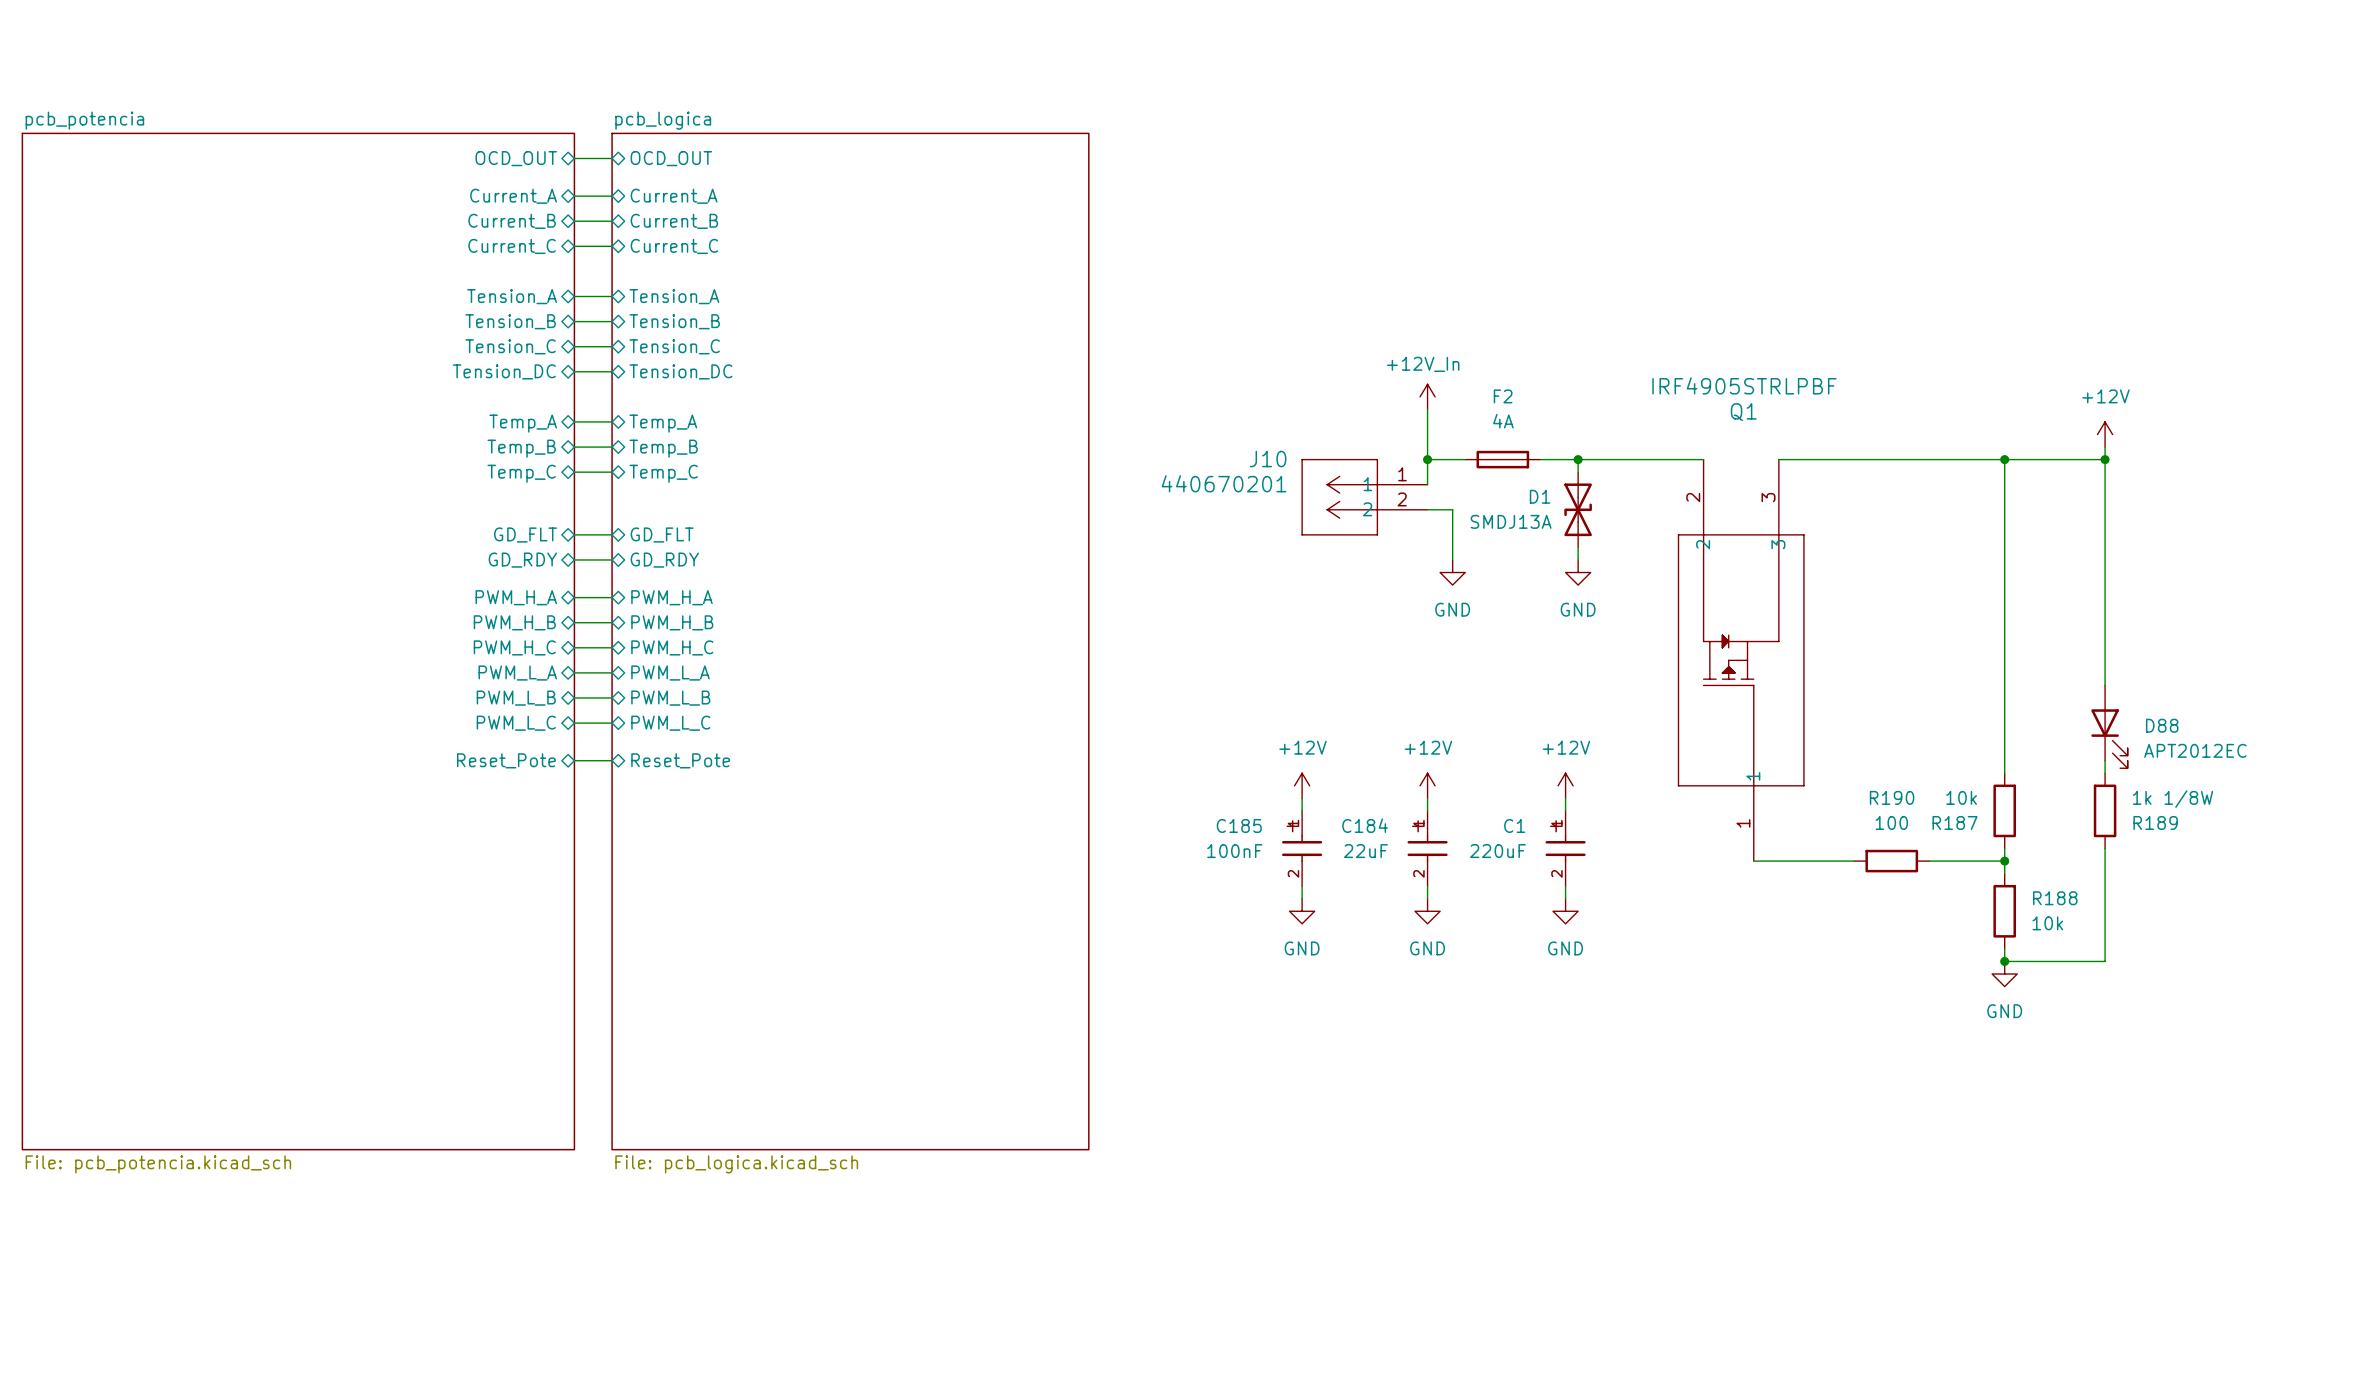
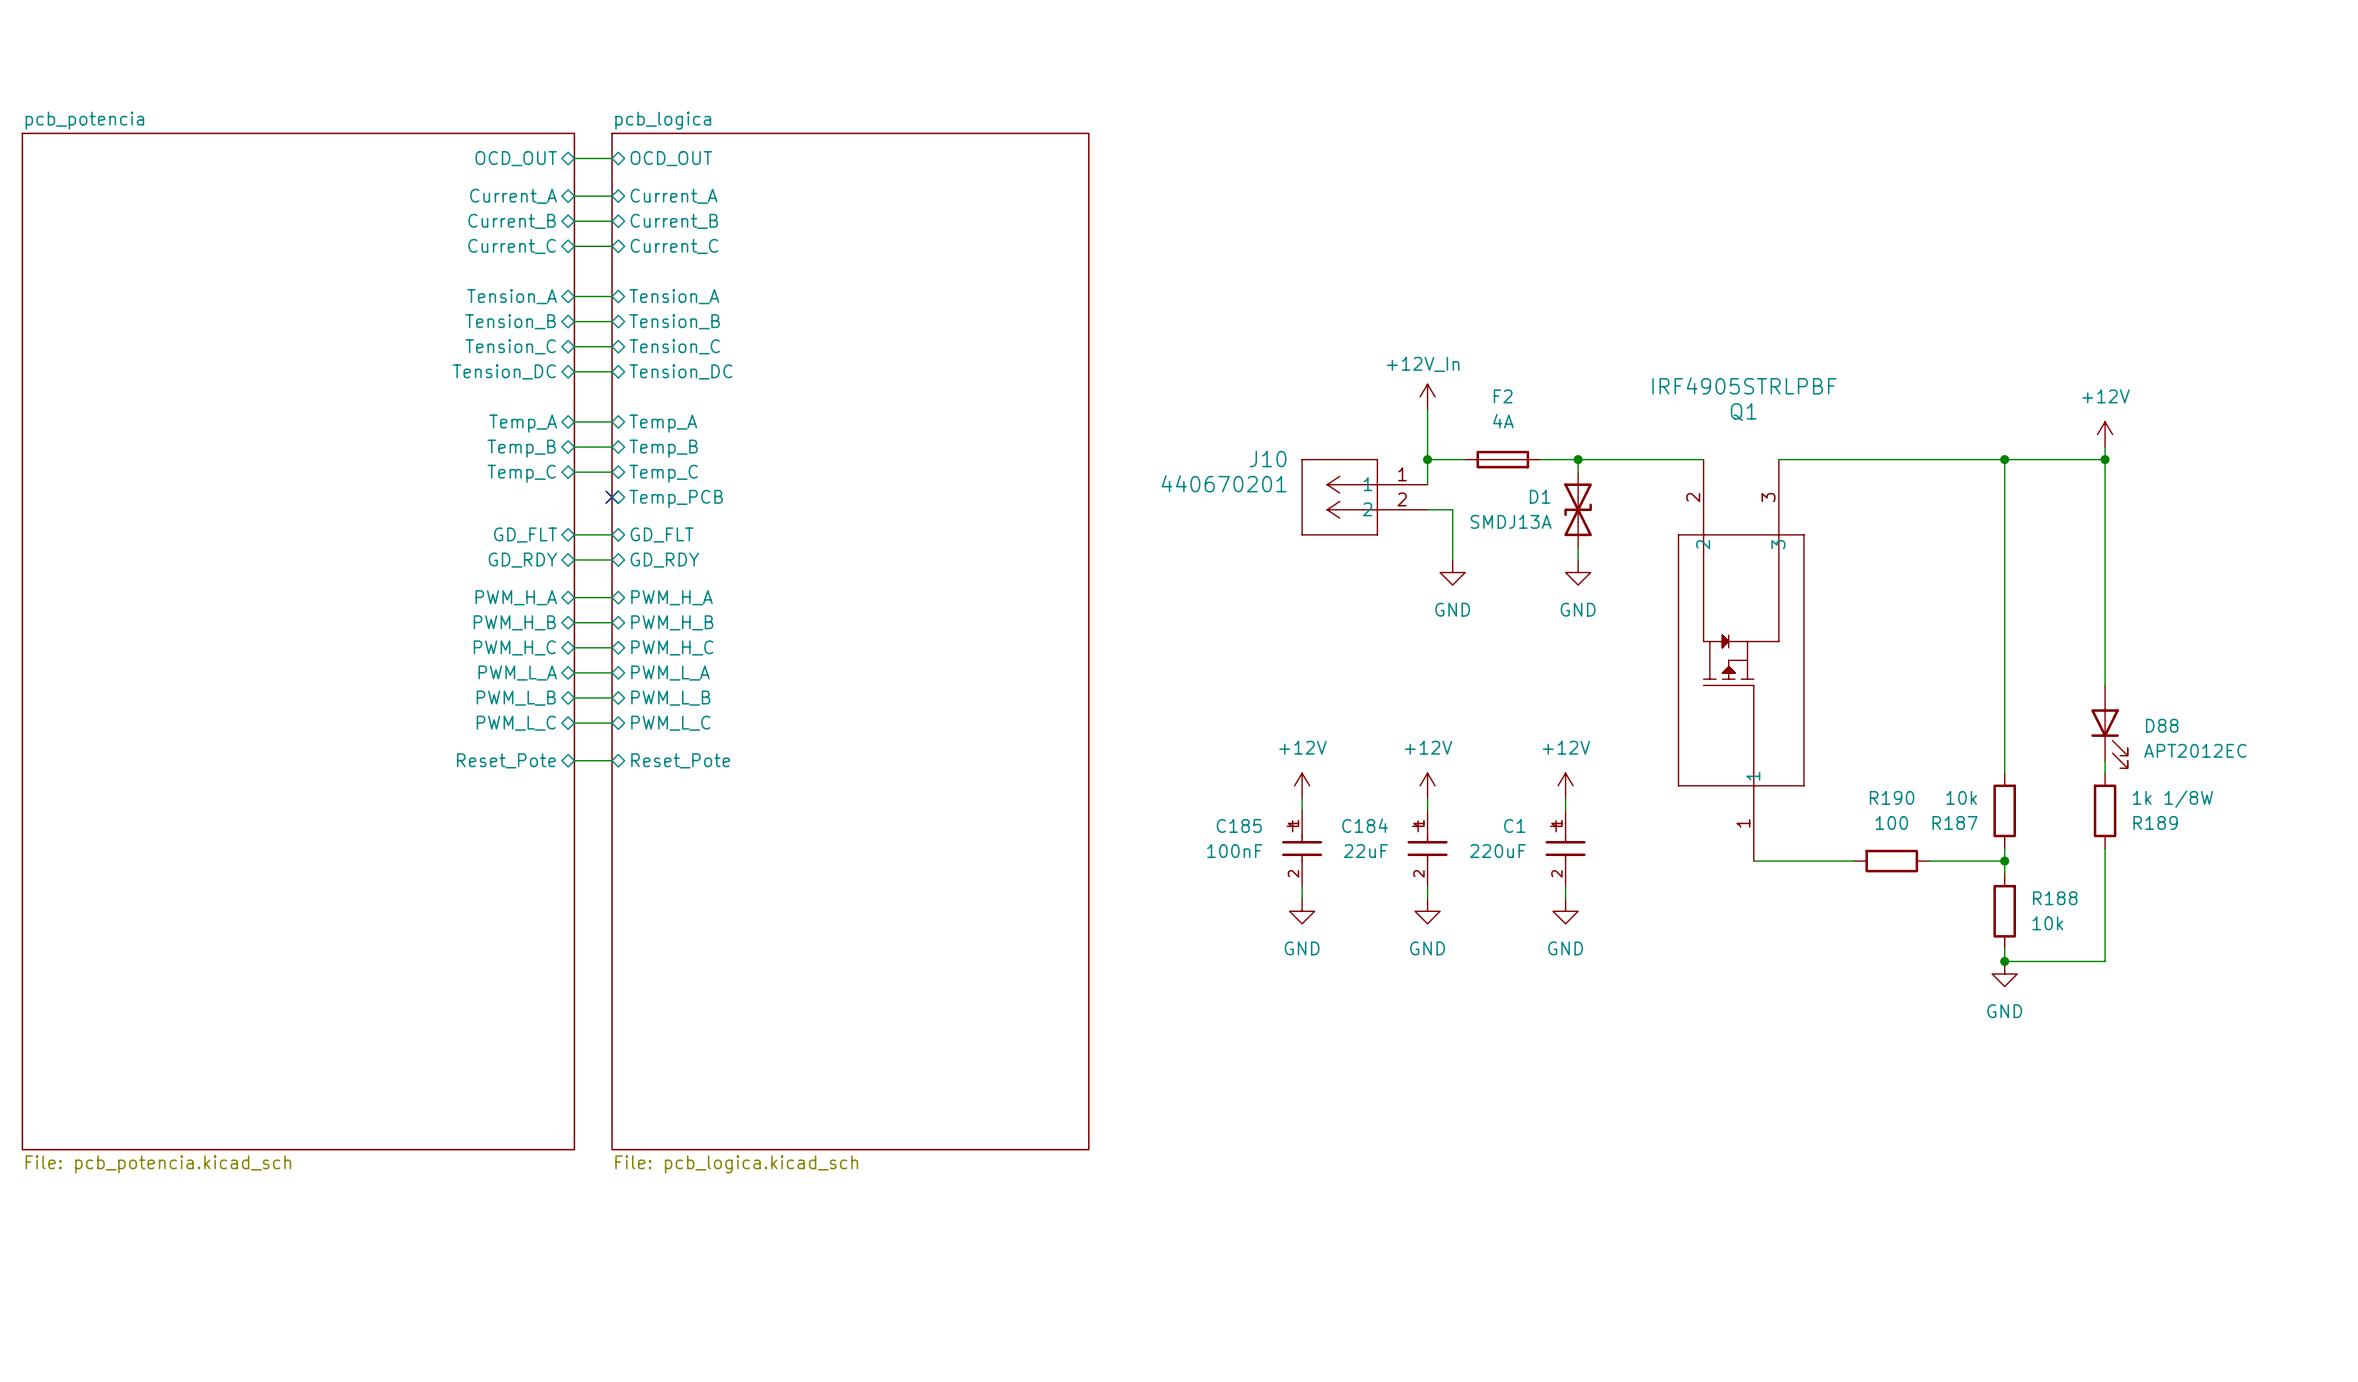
no-connect mark: none -> (612, 497)
sheet pin: none -> Temp_PCB (676, 498)

